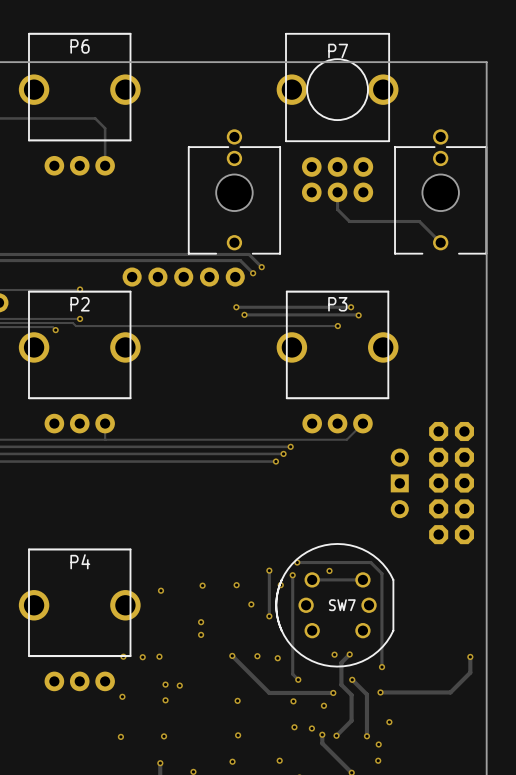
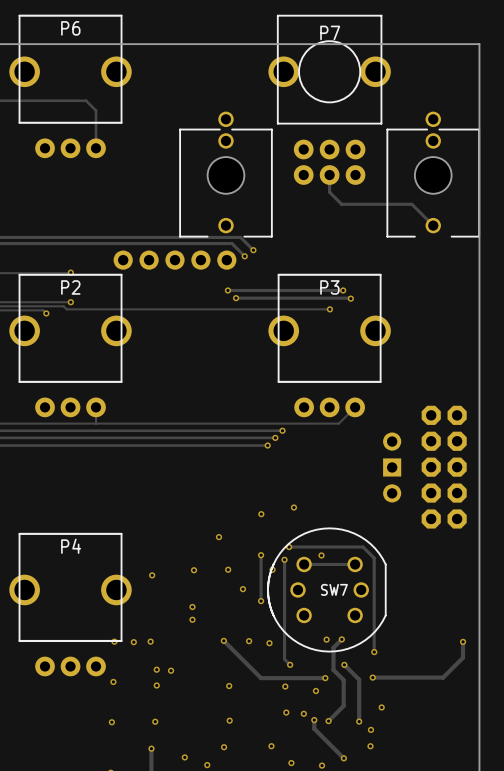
via: none -> (293, 507)
via: none -> (261, 514)
via: none -> (218, 537)

